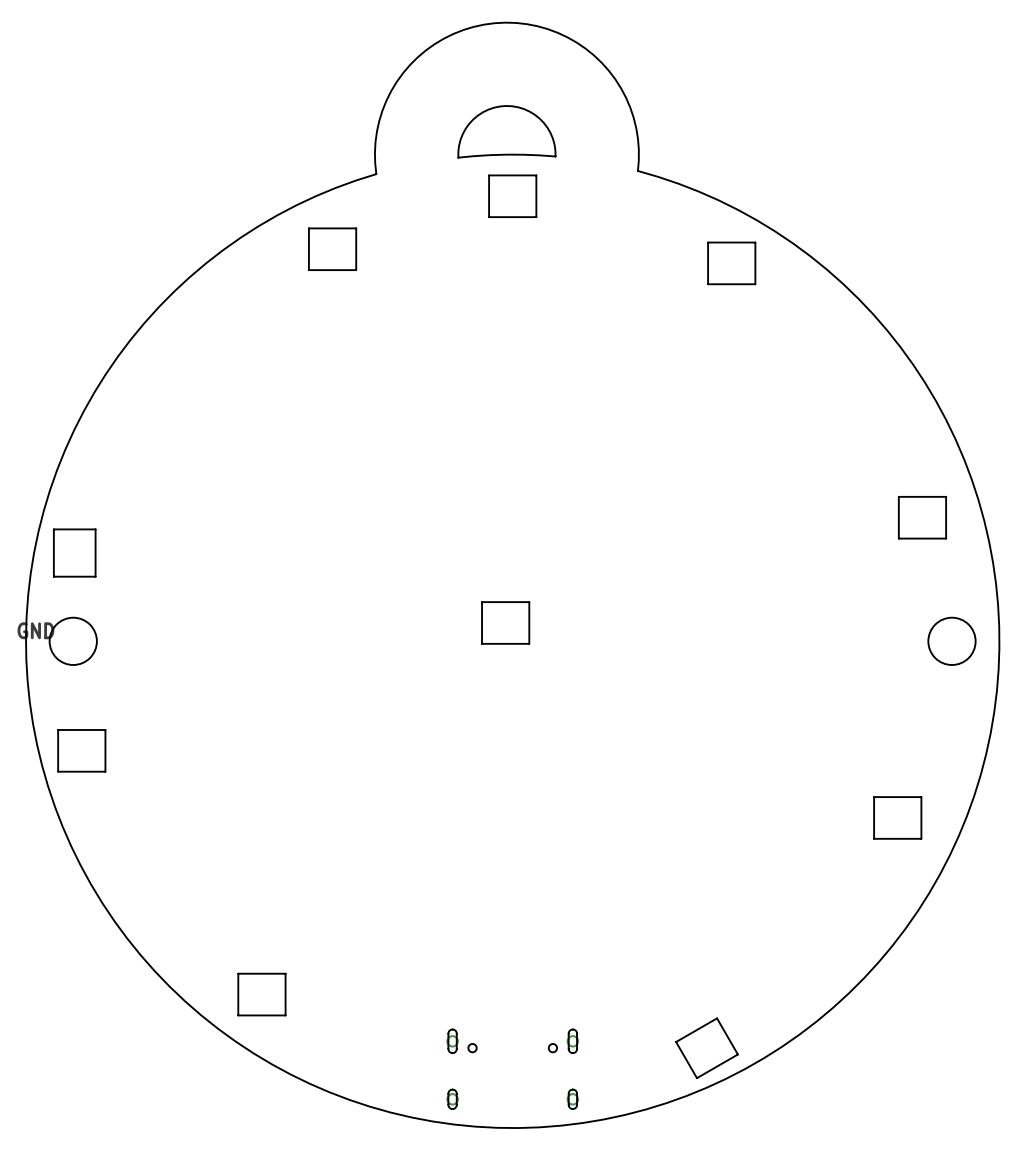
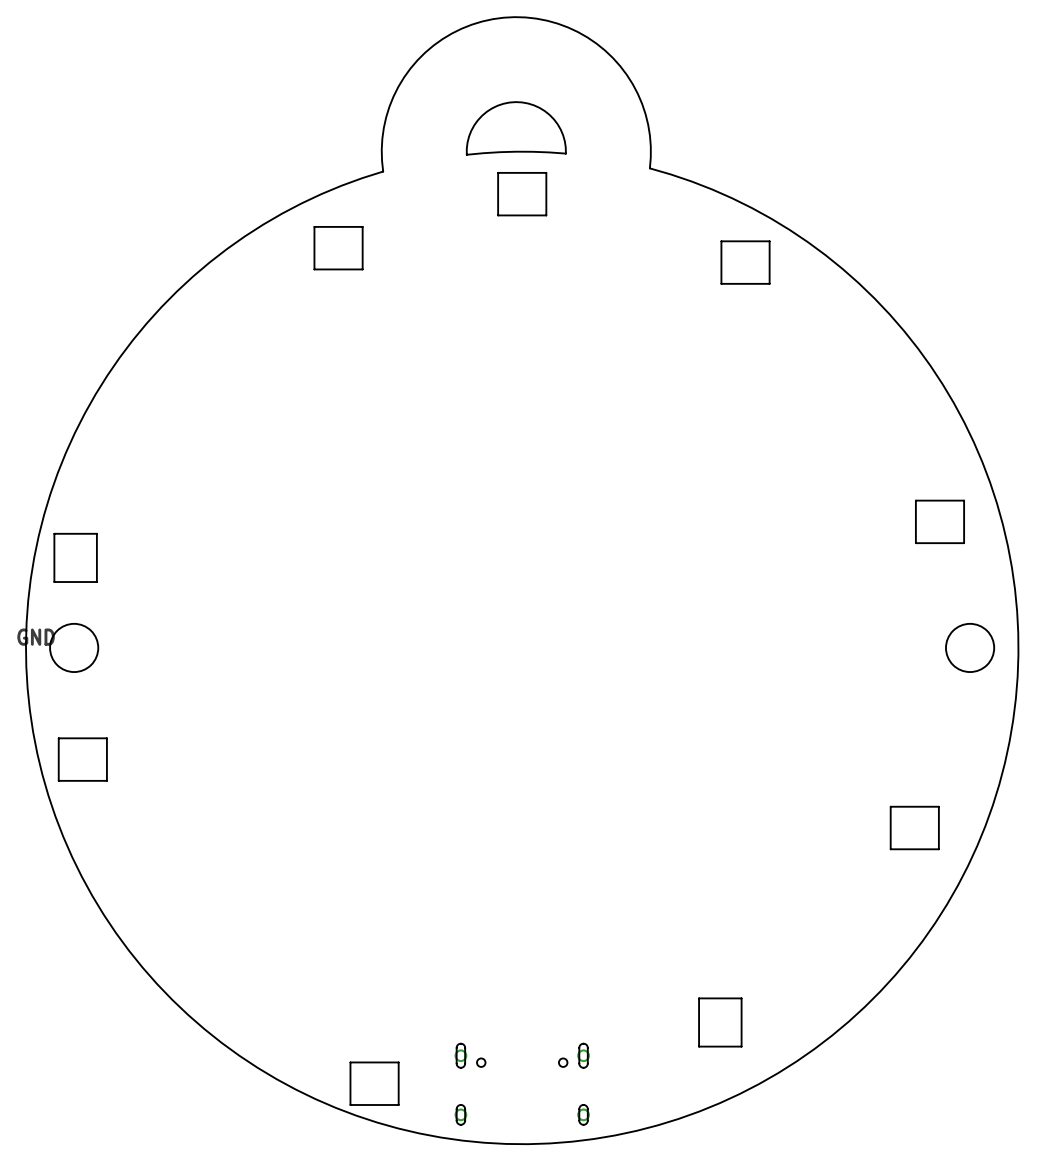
part: (505, 622) -> none
part position: (261, 994) -> (374, 1083)
part: none -> (720, 1022)
part: (707, 1048) -> none

